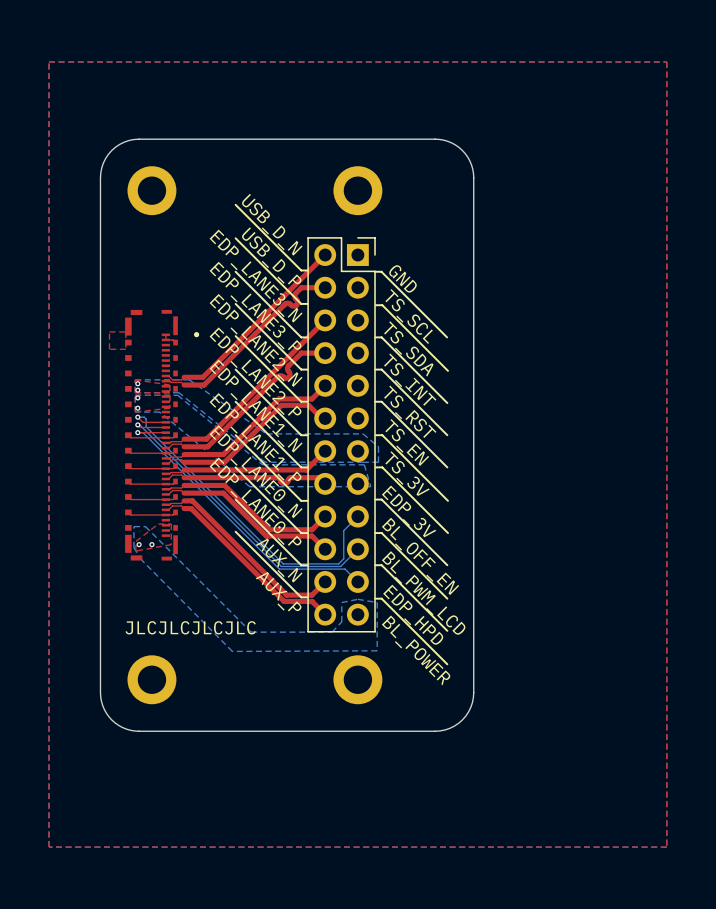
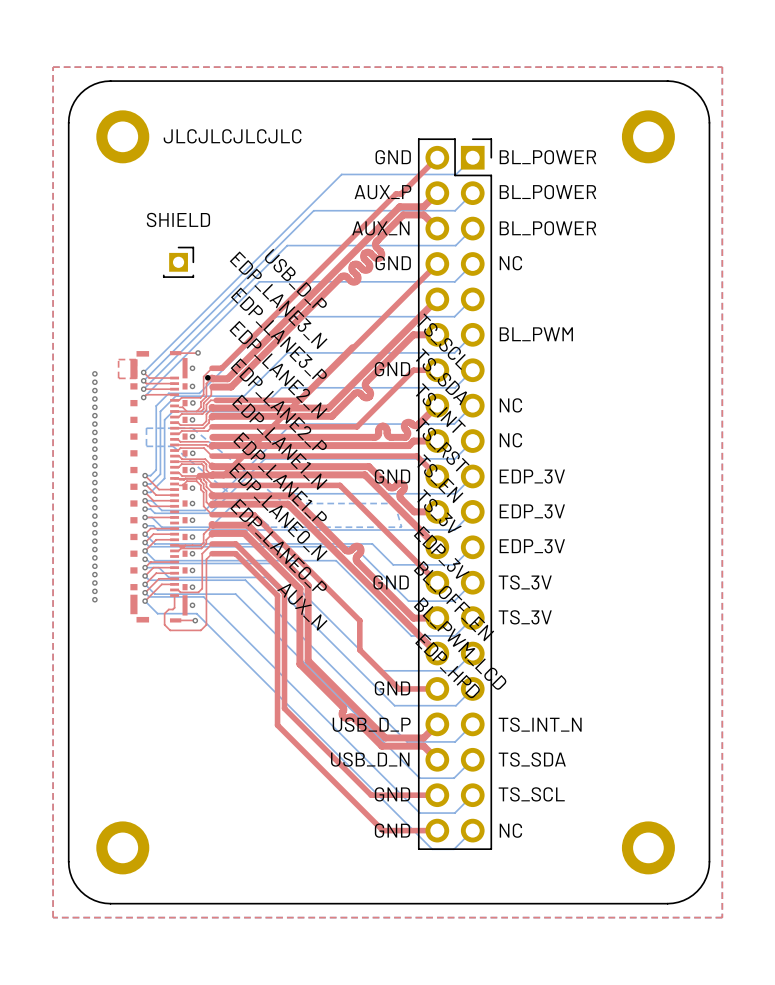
board edge: none -> (110, 81) (667, 81) (688, 86) (700, 97) (708, 112) (709, 122) (709, 861) (706, 877) (693, 895) (683, 900) (667, 903) (110, 903) (94, 900) (77, 887) (71, 877) (68, 861) (68, 122) (71, 106) (80, 93) (94, 84) (110, 81)
text: none -> JLCJLCJLCJLC (232, 136)
part: none -> (648, 136)
board edge: (139, 139) (439, 139) (455, 145) (469, 161) (473, 177) (473, 692) (468, 711) (454, 726) (435, 731) (139, 731) (118, 725) (104, 709) (100, 692) (100, 177) (103, 163) (111, 150) (124, 142) (139, 139) -> none
text: none -> GND (393, 157)
top track: none -> (437, 157) (401, 193) (396, 193) (221, 368) (212, 368) (203, 376) (203, 394) (200, 397) (181, 397) (179, 400) (174, 400)
bottom track: none -> (472, 157) (456, 174) (341, 174) (143, 372)
text: none -> BL_POWER (547, 157)
text: none -> AUX_P (382, 192)
bottom track: none -> (472, 193) (455, 210) (313, 210) (143, 380)
text: none -> BL_POWER (547, 192)
part position: (151, 190) -> (122, 136)
part: (357, 190) -> none
text: none -> SHIELD (178, 219)
line: (235, 204) (301, 270) (307, 270) -> none
top track: none -> (437, 228) (423, 214) (403, 214) (375, 242) (375, 246) (381, 253) (380, 257) (376, 258) (369, 252) (366, 252) (363, 256) (369, 264) (368, 269) (363, 269) (356, 264) (352, 265) (352, 270) (357, 276) (356, 281) (352, 282) (345, 276) (341, 276) (231, 387) (212, 387) (211, 395) (203, 403) (203, 408) (201, 411) (196, 411)
bottom track: none -> (472, 228) (455, 245) (287, 245) (143, 389)
text: none -> AUX_N (380, 228)
text: none -> BL_POWER (547, 228)
text: USB_D_N (272, 224) -> none
line: (235, 238) (301, 303) (307, 303) -> none
part: none -> (178, 262)
text: none -> NC (510, 263)
top track: none -> (437, 263) (300, 400) (210, 400) (202, 414) (181, 414) (178, 417) (174, 417)
bottom track: none -> (472, 263) (454, 281) (259, 281) (143, 397)
top track: (325, 255) (202, 377) (184, 377) -> (437, 193) (423, 206) (399, 206) (227, 378) (212, 378) (206, 383) (206, 396) (201, 402) (199, 408)
line: (235, 271) (301, 337) (307, 337) -> none
line: (375, 271) (381, 271) (447, 337) -> none
top track: none -> (437, 299) (328, 408) (212, 407) (206, 414) (206, 421) (202, 425) (180, 425) (174, 422)
bottom track: none -> (472, 299) (454, 316) (276, 316) (199, 393) (168, 393) (156, 405) (156, 470) (150, 475) (145, 475)
text rotation: 0° (402, 278) -> 45° counterclockwise (393, 263)
top track: (325, 287) (301, 287) (294, 295) (297, 301) (296, 305) (285, 303) (204, 385) (184, 385) (181, 382) (165, 381) -> none
line: (235, 303) (301, 369) (307, 369) -> none
line: (375, 305) (382, 305) (447, 370) -> none
top track: none -> (437, 334) (413, 334) (366, 382) (365, 386) (370, 392) (369, 396) (365, 397) (359, 392) (355, 393) (332, 416) (212, 416) (203, 428) (174, 428)
bottom track: none -> (472, 334) (454, 352) (287, 352) (244, 396) (175, 396) (160, 411) (160, 474) (150, 484) (145, 484)
text: none -> BL_PWM (536, 334)
top track: none -> (198, 352) (175, 353)
via: none -> (198, 352)
top track: (165, 334) (165, 339) (172, 339) (175, 342) -> none
line: (235, 336) (301, 401) (307, 401) -> none
line: (375, 337) (381, 337) (447, 403) -> none
via: none -> (192, 368)
text: none -> GND (392, 369)
top track: none -> (437, 370) (413, 370) (357, 426) (212, 426) (207, 431) (181, 431) (179, 433) (174, 433)
bottom track: none -> (472, 370) (455, 387) (281, 387) (258, 411) (172, 411) (164, 419) (164, 478) (150, 492) (145, 492)
top track: none -> (143, 372) (149, 378) (174, 378)
via: none -> (143, 372)
via: none -> (94, 373)
top track: none -> (143, 380) (146, 383) (174, 383)
via: none -> (143, 380)
via: none -> (94, 382)
top track: (325, 353) (301, 353) (287, 366) (288, 377) (278, 376) (207, 446) (184, 446) -> (437, 688) (398, 688) (359, 649) (359, 620) (253, 514) (212, 514) (203, 506) (203, 492) (199, 484)
via: none -> (192, 386)
top track: none -> (143, 389) (174, 389)
via: none -> (143, 389)
via: none -> (94, 390)
top track: none -> (174, 394) (146, 394) (143, 397)
via: none -> (143, 397)
via: none -> (94, 398)
line: (235, 369) (301, 435) (307, 435) -> none
line: (375, 369) (381, 369) (447, 435) -> none
via: none -> (192, 402)
top track: none -> (437, 405) (417, 425) (414, 425) (408, 422) (405, 423) (404, 427) (407, 433) (405, 437) (389, 436) (386, 428) (382, 426) (379, 427) (378, 434) (375, 437) (212, 437)
bottom track: none -> (472, 405) (454, 424) (291, 424) (205, 510) (161, 510) (152, 500) (145, 500)
text: none -> NC (510, 405)
via: none -> (94, 407)
top zone outline: (135, 379) (135, 392) (169, 392) (169, 385) (135, 379) -> none
bottom zone outline: (135, 379) (135, 392) (178, 392) (265, 462) (378, 462) (378, 446) (363, 433) (266, 433) (189, 379) (135, 379) -> none
via: none -> (94, 415)
via: (137, 383) -> none
top track: (325, 385) (312, 398) (278, 398) (223, 454) (184, 454) (181, 457) (165, 458) -> none
via: none -> (192, 419)
via: (137, 390) -> none
via: none -> (94, 424)
top zone outline: (135, 395) (135, 412) (169, 408) (169, 395) (135, 395) -> none
via: (137, 397) -> none
via: none -> (94, 432)
line: (235, 401) (301, 467) (307, 467) -> none
line: (375, 401) (381, 401) (447, 467) -> none
via: none -> (192, 436)
top track: none -> (174, 439) (180, 441) (208, 441)
via: none -> (94, 440)
text: none -> NC (510, 440)
top track: none -> (437, 441) (413, 441) (409, 445) (174, 444)
bottom track: none -> (472, 441) (454, 458) (265, 458) (210, 513) (154, 513) (150, 509) (145, 509)
via: (137, 408) -> none
via: none -> (94, 449)
top track: none -> (174, 450) (180, 448) (204, 448) (212, 456) (416, 456) (437, 476)
top track: (137, 417) (142, 422) (169, 422) -> none
bottom track: (137, 417) (146, 419) (146, 426) (283, 563) (338, 563) (343, 558) (343, 530) (357, 516) -> none
via: (137, 417) -> none
via: none -> (192, 453)
top track: (325, 418) (321, 418) (308, 405) (281, 405) (224, 462) (184, 462) (181, 459) (172, 459) (165, 463) -> none
top track: none -> (174, 456) (179, 456) (182, 459) (205, 459) (212, 466) (368, 466) (390, 487) (393, 487) (399, 483) (403, 484) (404, 488) (399, 497) (414, 511) (437, 511)
via: none -> (94, 457)
top track: (137, 424) (140, 427) (165, 427) -> none
bottom track: (137, 424) (281, 566) (340, 566) (357, 549) -> none
via: (137, 424) -> none
top track: none -> (174, 461) (203, 461) (206, 464) (206, 470) (212, 475) (364, 474) (437, 547)
via: none -> (94, 465)
top track: none -> (174, 467) (178, 467) (181, 464) (201, 464) (203, 472) (212, 485) (340, 485) (437, 582)
top track: (137, 432) (165, 432) -> none
bottom track: (137, 432) (142, 432) (279, 569) (345, 569) (357, 581) -> none
via: (137, 432) -> none
via: none -> (192, 470)
part: (341, 434) -> none
top track: (128, 435) (130, 437) (172, 437) (175, 435) -> none
part position: (162, 435) -> (170, 486)
line: (235, 435) (301, 500) (307, 500) -> none
line: (375, 435) (382, 435) (447, 500) -> none
top track: none -> (174, 472) (179, 472) (182, 475) (202, 475) (206, 486) (212, 495) (291, 495) (345, 550) (349, 551) (355, 546) (359, 547) (360, 551) (356, 557) (356, 561) (413, 618) (437, 618)
via: none -> (94, 474)
top track: none -> (145, 475) (159, 489) (174, 489)
via: none -> (145, 475)
text: none -> GND (392, 476)
bottom track: none -> (472, 476) (455, 493) (244, 493) (210, 527) (161, 527) (152, 517) (145, 517)
top track: none -> (174, 478) (199, 478) (206, 490) (206, 502) (209, 504) (287, 504) (437, 653)
text: none -> EDP_3V (532, 476)
via: none -> (94, 482)
top track: none -> (145, 484) (156, 495) (174, 495)
via: none -> (145, 484)
top track: (128, 450) (130, 453) (172, 453) (175, 450) -> none
via: none -> (192, 488)
top track: (325, 451) (306, 469) (184, 469) (181, 472) (165, 473) -> none
via: none -> (94, 490)
top track: none -> (145, 492) (153, 500) (174, 500)
via: none -> (145, 492)
part: none -> (455, 494)
via: none -> (94, 499)
top track: none -> (145, 500) (150, 506) (174, 506)
via: none -> (145, 500)
via: none -> (192, 503)
top track: (128, 466) (130, 468) (172, 468) (175, 466) -> none
line: (235, 467) (301, 533) (307, 533) -> none
line: (375, 467) (382, 467) (447, 533) -> none
via: none -> (94, 507)
via: none -> (145, 509)
bottom track: none -> (472, 511) (454, 530) (157, 530) (153, 525) (145, 525)
text: none -> EDP_3V (532, 511)
via: none -> (94, 516)
top track: none -> (145, 517) (174, 517)
via: none -> (145, 517)
top track: (165, 478) (172, 475) (181, 475) (184, 477) (277, 477) (281, 482) (285, 483) (290, 477) (319, 477) (325, 483) -> none
via: none -> (192, 520)
top track: (128, 481) (130, 484) (172, 484) (175, 481) -> none
via: none -> (94, 524)
via: none -> (145, 525)
top track: none -> (174, 528) (150, 528) (145, 534)
top track: (165, 489) (181, 487) (184, 485) (224, 485) (268, 529) (312, 529) (325, 516) -> none
via: none -> (94, 532)
bottom track: none -> (145, 534) (154, 543) (372, 543) (393, 564) (454, 564) (472, 547)
via: none -> (145, 534)
top track: none -> (174, 534) (153, 534) (145, 542)
top track: (165, 494) (172, 490) (181, 490) (184, 493) (223, 493) (266, 536) (312, 536) (325, 549) -> none
via: none -> (192, 536)
top track: (128, 497) (130, 499) (172, 499) (175, 497) -> none
top track: none -> (174, 539) (156, 539) (145, 550)
via: none -> (94, 541)
line: (235, 499) (301, 565) (307, 565) -> none
line: (375, 499) (381, 499) (447, 565) -> none
bottom track: none -> (145, 542) (149, 546) (354, 546) (408, 601) (454, 601) (472, 582)
via: none -> (145, 542)
top track: (181, 503) (184, 500) (192, 500) (286, 595) (312, 595) (325, 581) -> (196, 545) (200, 545) (203, 542) (203, 534) (212, 524) (247, 525) (308, 585) (308, 660) (385, 737) (423, 737) (437, 724)
text: none -> EDP_3V (532, 546)
via: none -> (94, 549)
bottom track: none -> (145, 550) (154, 560) (336, 560) (411, 635) (454, 635) (472, 618)
via: none -> (145, 550)
top track: none -> (174, 550) (180, 548) (201, 548) (212, 533) (244, 533) (299, 588) (299, 664) (343, 707) (342, 715) (346, 718) (353, 717) (381, 746) (423, 746) (437, 759)
top track: (165, 509) (172, 506) (191, 508) (284, 601) (312, 601) (325, 614) -> none
via: none -> (192, 553)
top track: (128, 512) (130, 515) (172, 515) (175, 512) -> none
via: none -> (94, 557)
bottom track: none -> (145, 559) (150, 563) (273, 563) (380, 670) (454, 670) (472, 653)
via: none -> (145, 559)
top track: none -> (174, 562) (150, 562) (145, 567)
via: none -> (94, 566)
bottom track: none -> (145, 567) (159, 567) (168, 577) (266, 577) (394, 705) (456, 705) (472, 688)
via: none -> (145, 567)
top zone outline: (158, 524) (135, 541) (135, 551) (171, 544) (171, 524) (158, 524) -> none
top track: none -> (174, 567) (153, 567) (145, 576)
bottom zone outline: (133, 526) (133, 547) (142, 560) (232, 651) (377, 650) (377, 602) (357, 599) (341, 602) (341, 621) (332, 632) (251, 632) (145, 526) (133, 526) -> none
via: none -> (192, 570)
top track: none -> (174, 573) (156, 573) (145, 584)
via: none -> (94, 574)
bottom track: none -> (145, 576) (149, 580) (245, 580) (407, 741) (455, 741) (472, 724)
via: none -> (145, 576)
line: (235, 531) (301, 597) (307, 597) -> none
line: (375, 533) (381, 533) (447, 598) -> none
top track: none -> (174, 578) (159, 578) (145, 592)
text: none -> GND (391, 582)
via: none -> (94, 582)
bottom track: none -> (145, 584) (154, 594) (235, 594) (419, 778) (454, 778) (472, 759)
via: none -> (145, 584)
top track: none -> (174, 584) (161, 584) (145, 601)
text: none -> TS_3V (525, 582)
via: none -> (192, 587)
via: (139, 544) -> none
via: (151, 544) -> none
top track: none -> (174, 589) (180, 592) (198, 592) (202, 588) (202, 553) (212, 543) (235, 543) (284, 592) (284, 708) (371, 795) (437, 795)
via: none -> (94, 591)
bottom track: none -> (145, 592) (149, 596) (203, 596) (419, 813) (454, 813) (472, 795)
via: none -> (145, 592)
top track: none -> (174, 595) (174, 607) (168, 609) (164, 613) (164, 624) (170, 630) (200, 630) (206, 624) (206, 559) (212, 553) (235, 553) (277, 595) (277, 725) (382, 830) (437, 830)
via: none -> (94, 599)
bottom track: none -> (145, 601) (157, 613) (196, 613) (432, 849) (454, 849) (472, 830)
via: none -> (145, 601)
via: none -> (192, 605)
line: (375, 565) (381, 565) (447, 630) -> none
text: none -> TS_3V (525, 617)
top track: none -> (175, 620) (195, 620)
via: none -> (195, 620)
text: AUX_P (278, 591) -> none
line: (375, 598) (381, 598) (447, 664) -> none
text: JLCJLCJLCJLC (190, 627) -> none
text: none -> GND (392, 688)
text: BL_POWER (416, 650) -> none
text: none -> USB_D_P (371, 724)
text: none -> TS_INT_N (540, 724)
part position: (151, 679) -> (122, 847)
part: (357, 679) -> none
text: none -> USB_D_N (370, 759)
text: none -> TS_SDA (532, 759)
text: none -> GND (392, 794)
text: none -> TS_SCL (531, 794)
text: none -> GND (392, 830)
text: none -> NC (510, 830)
part: none -> (648, 847)

